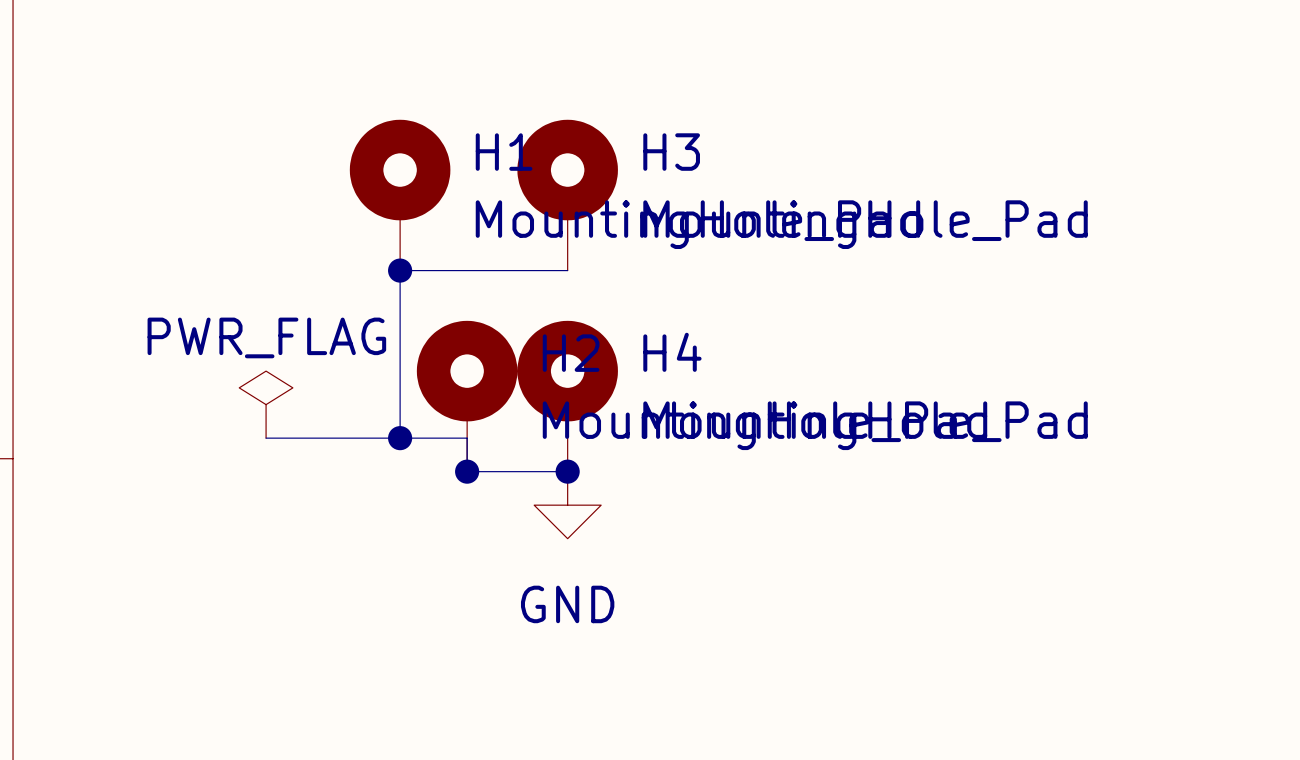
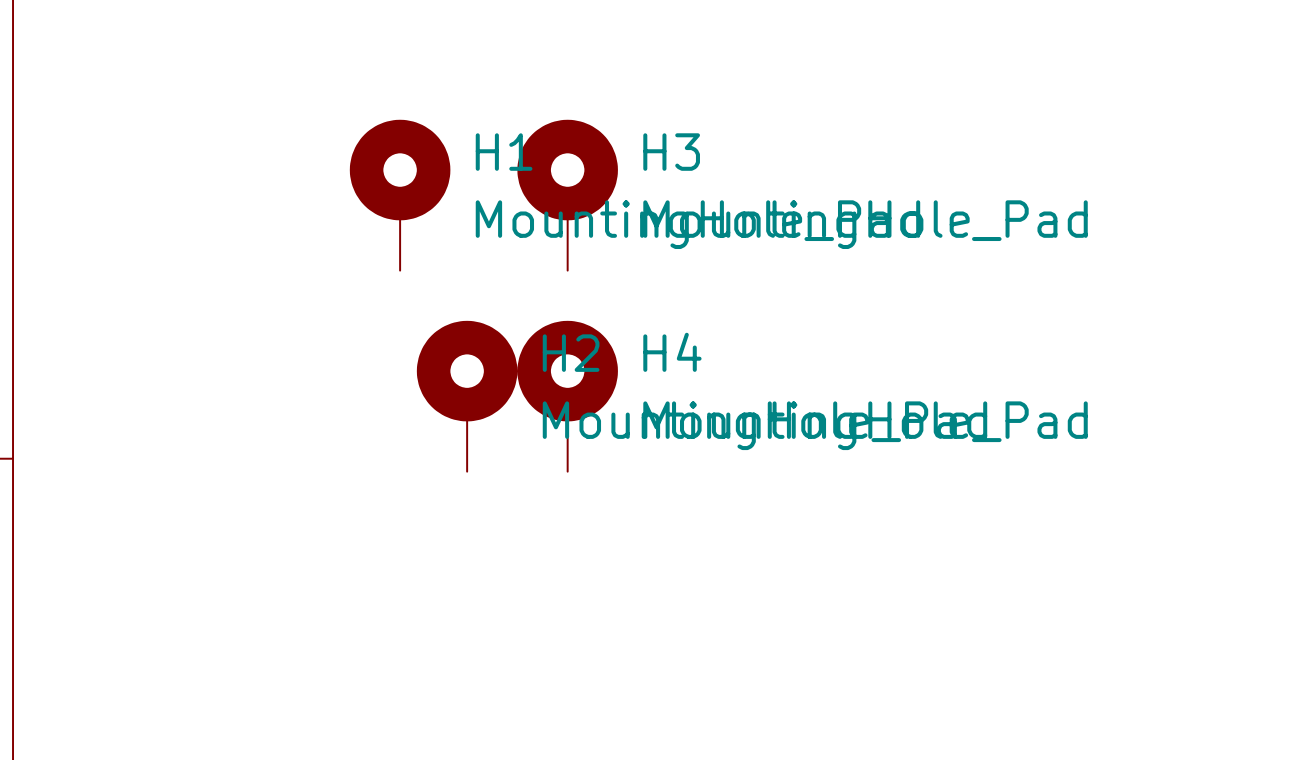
junction: (400, 270) -> none
wire: (567, 270) (400, 270) (400, 438) -> none
power symbol: PWR_FLAG (266, 404) -> none
wire: (266, 438) (467, 438) (467, 471) (567, 471) -> none
junction: (400, 438) -> none
junction: (467, 471) -> none
junction: (567, 471) -> none
power symbol: GND (567, 505) -> none

